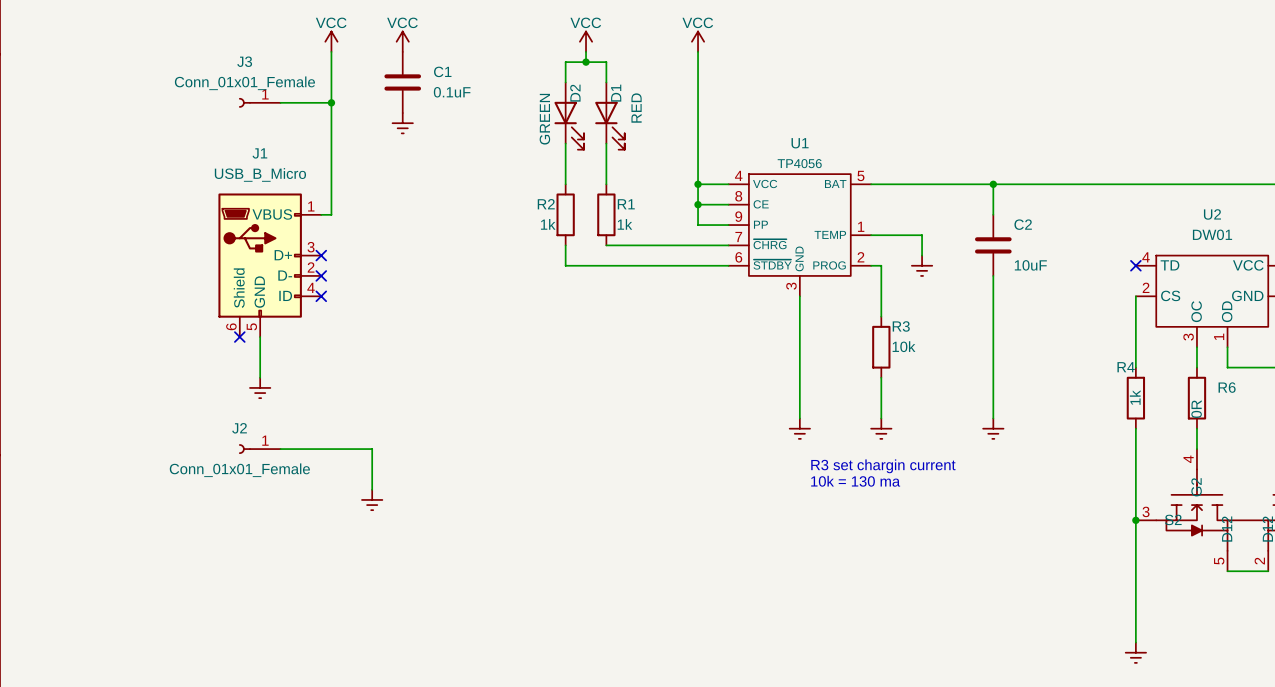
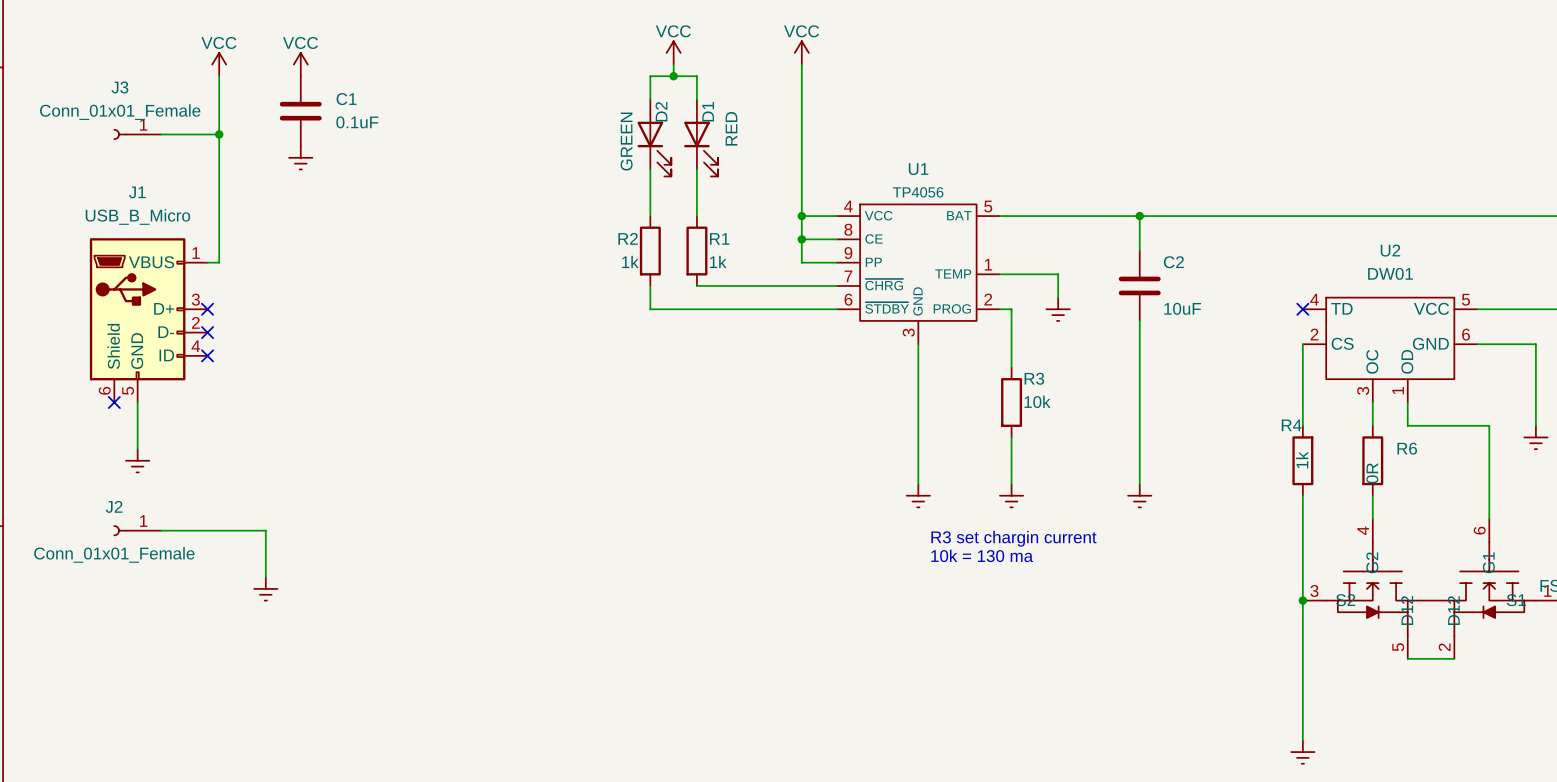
power symbol: VCC (331, 41) -> none
power symbol: VCC (402, 41) -> none
power symbol: none -> VCC (219, 64)
power symbol: none -> VCC (300, 64)
wire: (331, 51) (331, 214) (321, 214) -> (219, 76) (219, 262) (207, 262)
C1 position: (402, 82) -> (300, 111)
J3 position: (259, 102) -> (137, 134)
wire: (280, 102) (331, 102) -> (160, 134) (219, 134)
junction: (331, 102) -> none
junction: none -> (219, 134)
power symbol: (402, 123) -> none
power symbol: none -> (300, 157)
no-connect mark: (321, 255) -> none
no-connect mark: none -> (207, 309)
J1 position: (269, 265) -> (148, 320)
no-connect mark: (321, 275) -> none
no-connect mark: none -> (207, 332)
no-connect mark: (321, 296) -> none
no-connect mark: none -> (207, 355)
no-connect mark: (239, 337) -> none
wire: (260, 337) (260, 377) -> (137, 402) (137, 449)
no-connect mark: none -> (114, 402)
power symbol: (260, 387) -> none
power symbol: none -> (137, 460)
J2 position: (259, 449) -> (137, 530)
wire: (280, 449) (372, 449) (372, 489) -> (160, 530) (265, 530) (265, 577)
power symbol: (372, 499) -> none
power symbol: none -> (265, 588)

